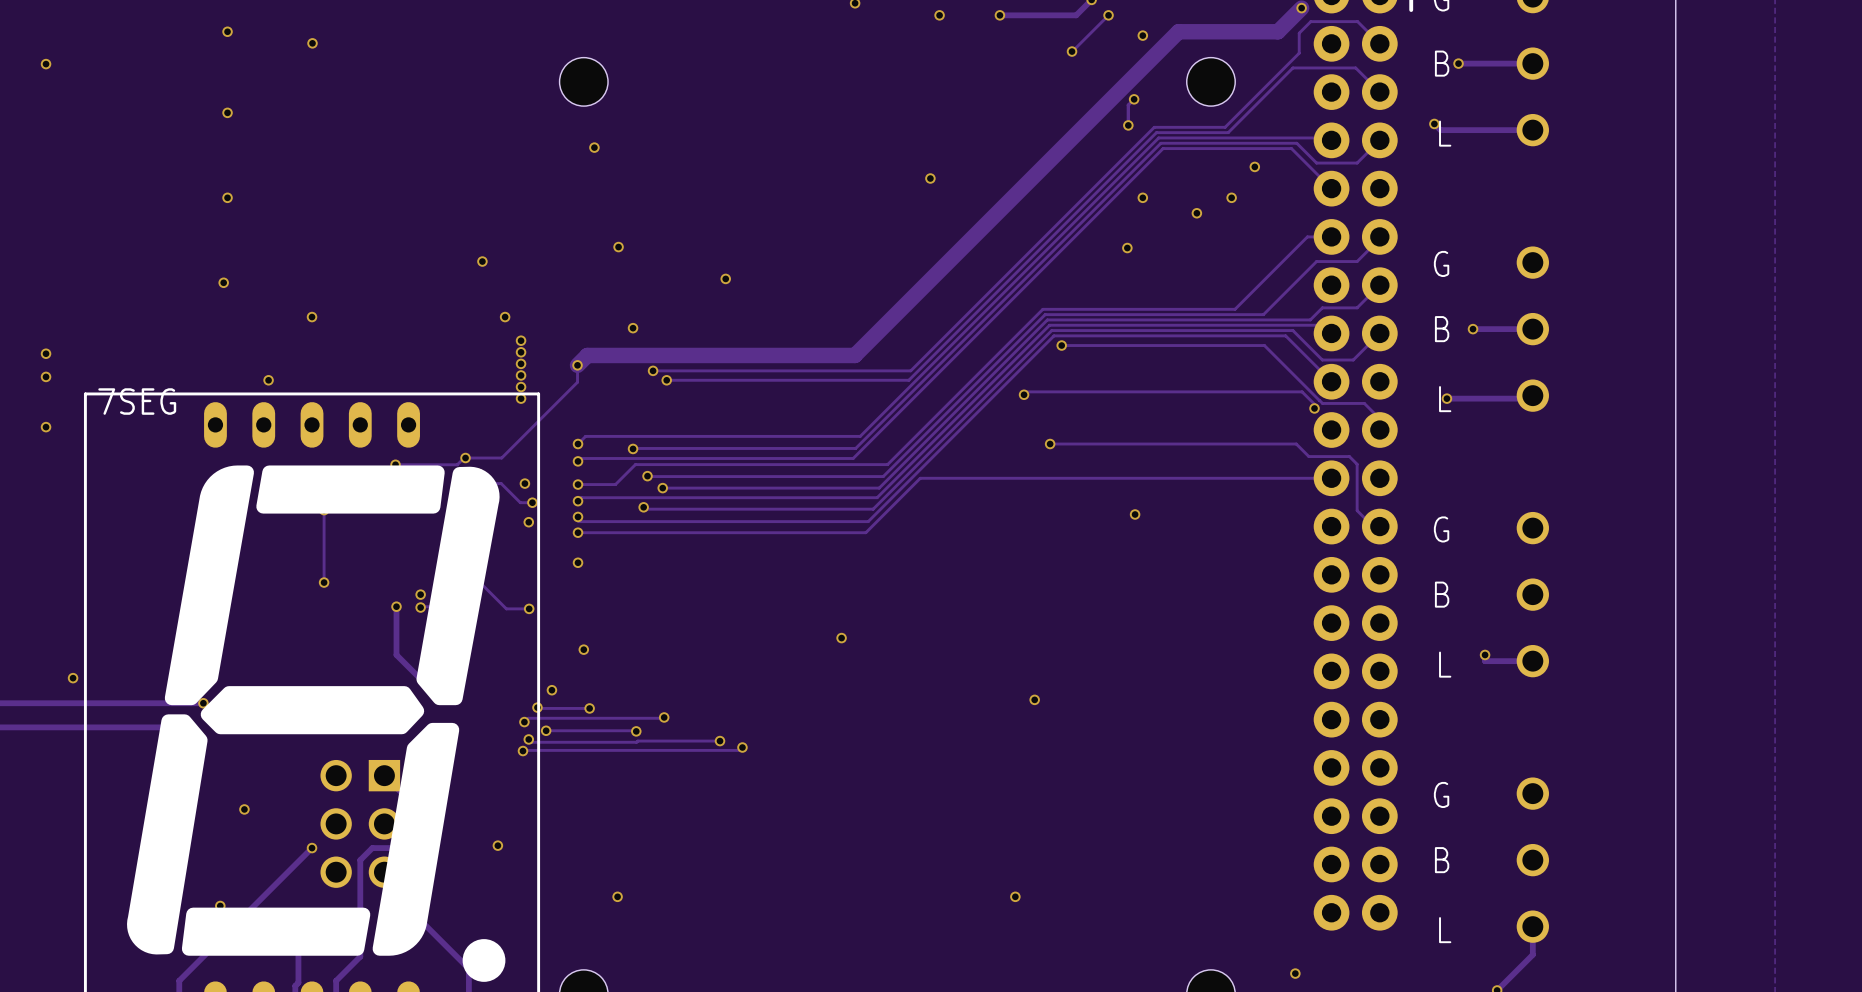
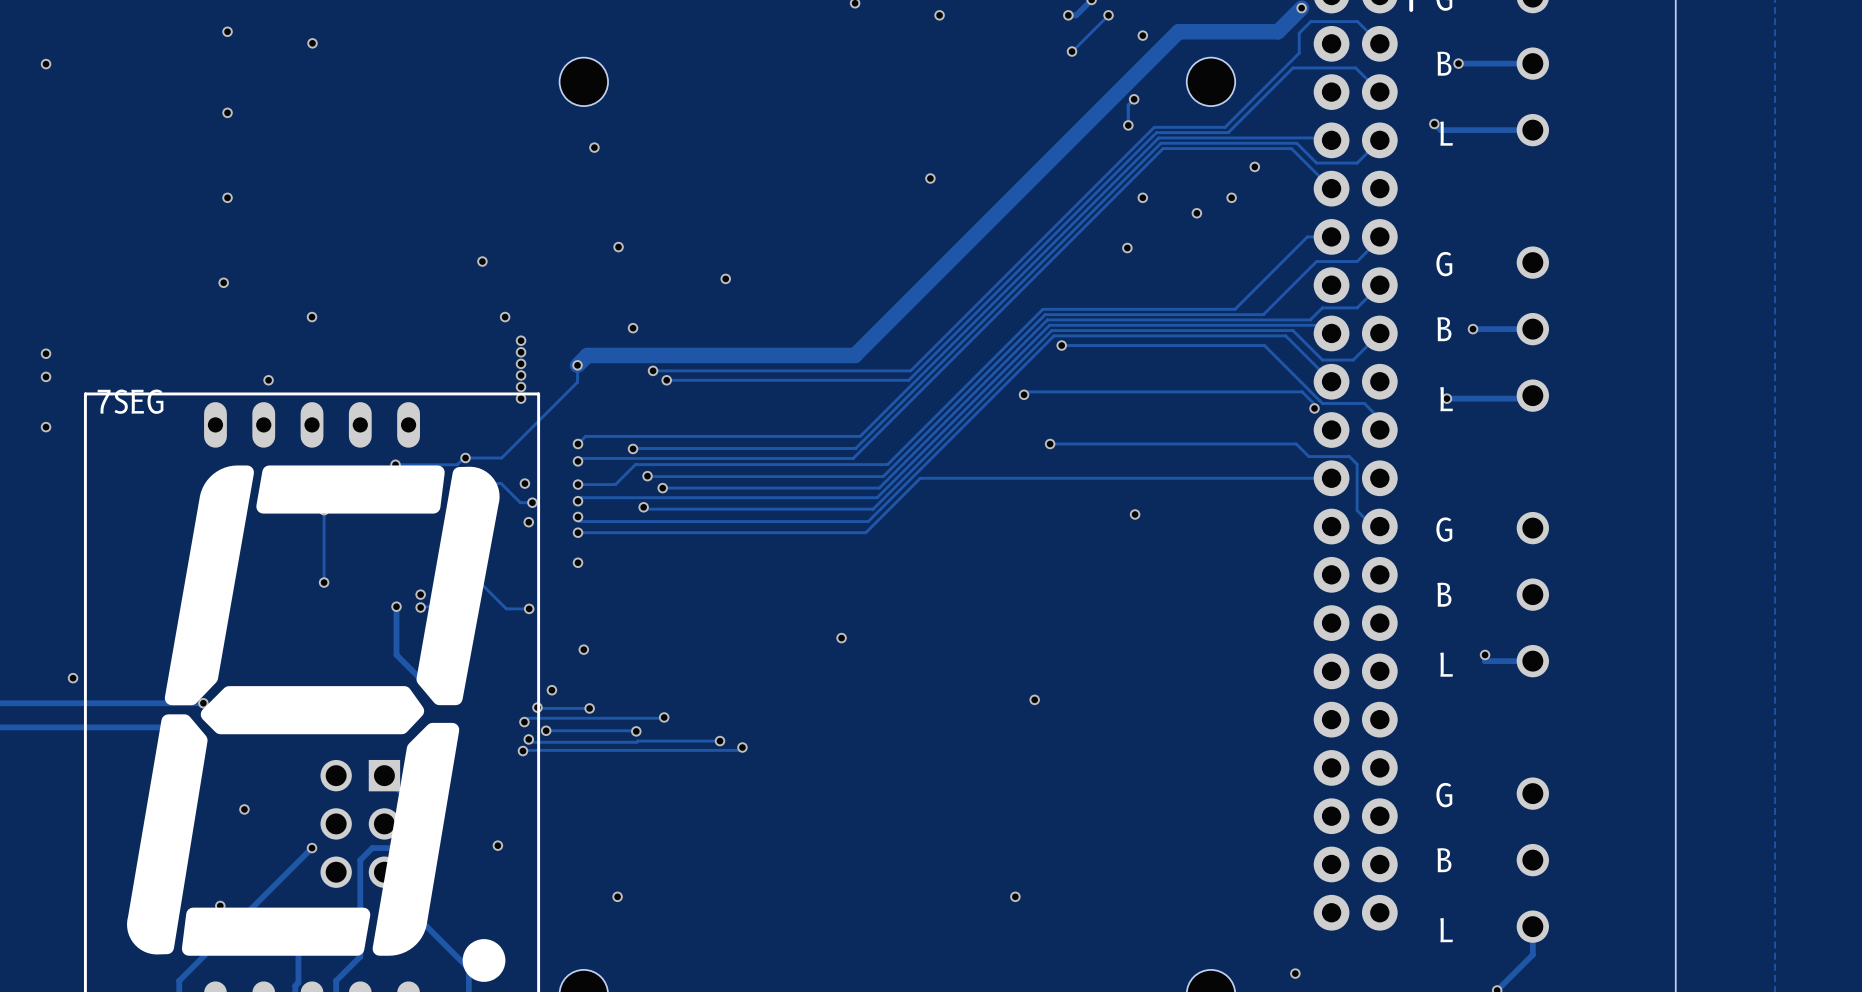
via position: (999, 15) -> (1068, 15)
track: (1068, 15) (999, 15) -> none

